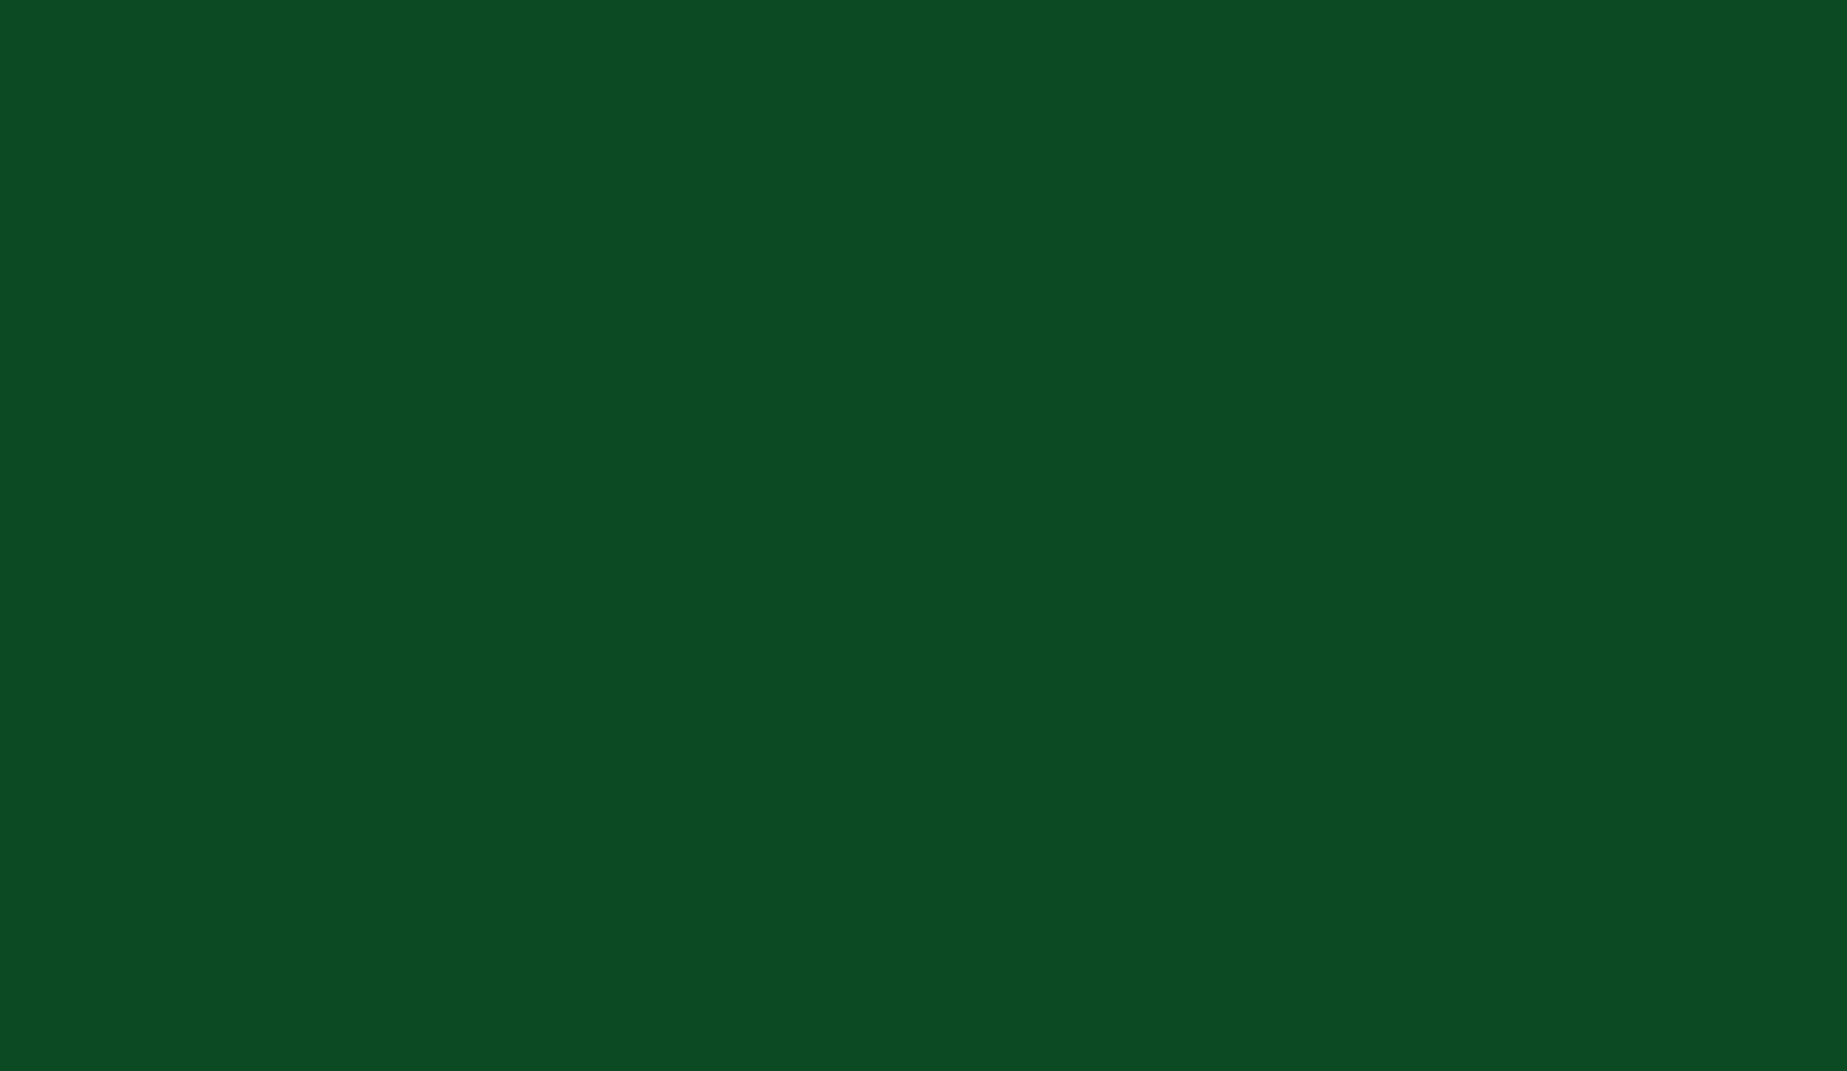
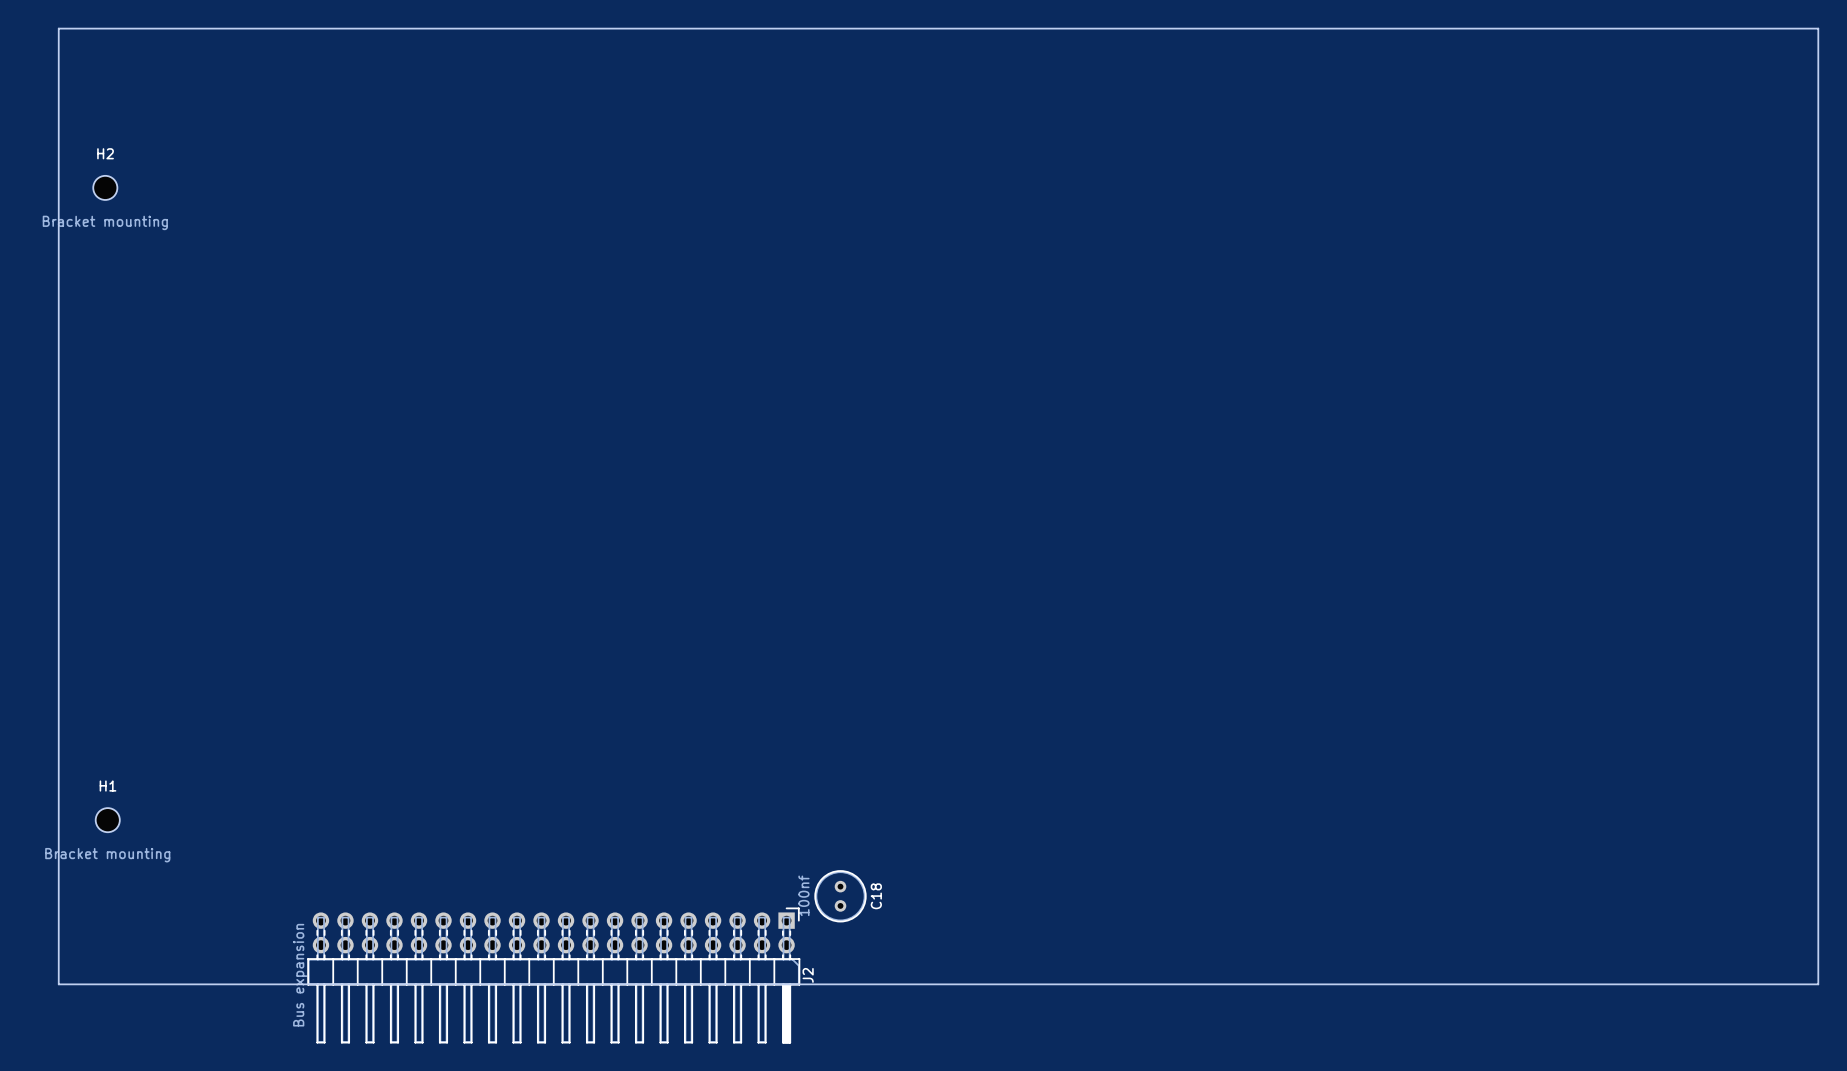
board edge: none -> (58, 28) (58, 984) (1818, 984) (1818, 28) (58, 28)
H2: none -> Bracket mounting (105, 187)
H1: none -> Bracket mounting (107, 820)
C18: none -> 100nf (840, 896)
J2: none -> Bus expansion (553, 975)

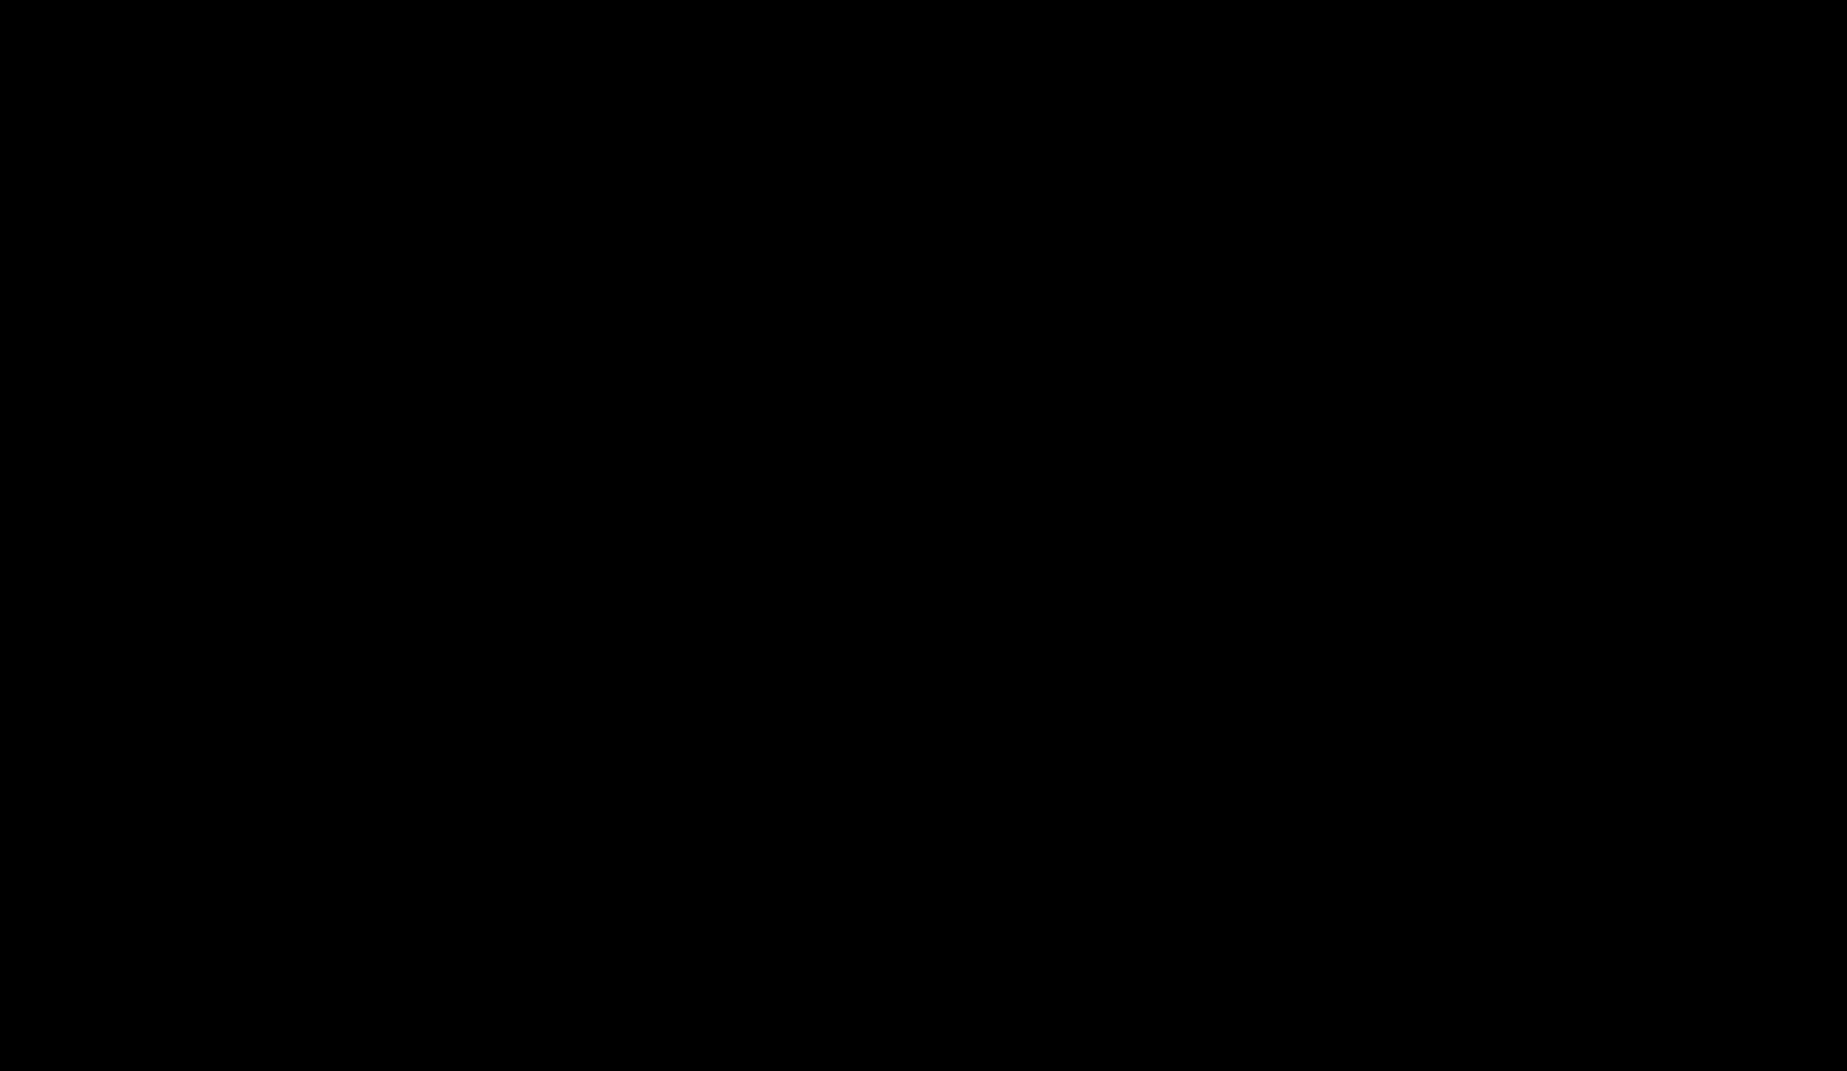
board edge: (58, 28) (58, 984) (1818, 984) (1818, 28) (58, 28) -> none
H2: Bracket mounting (105, 187) -> none
H1: Bracket mounting (107, 820) -> none
C18: 100nf (840, 896) -> none
J2: Bus expansion (553, 975) -> none

